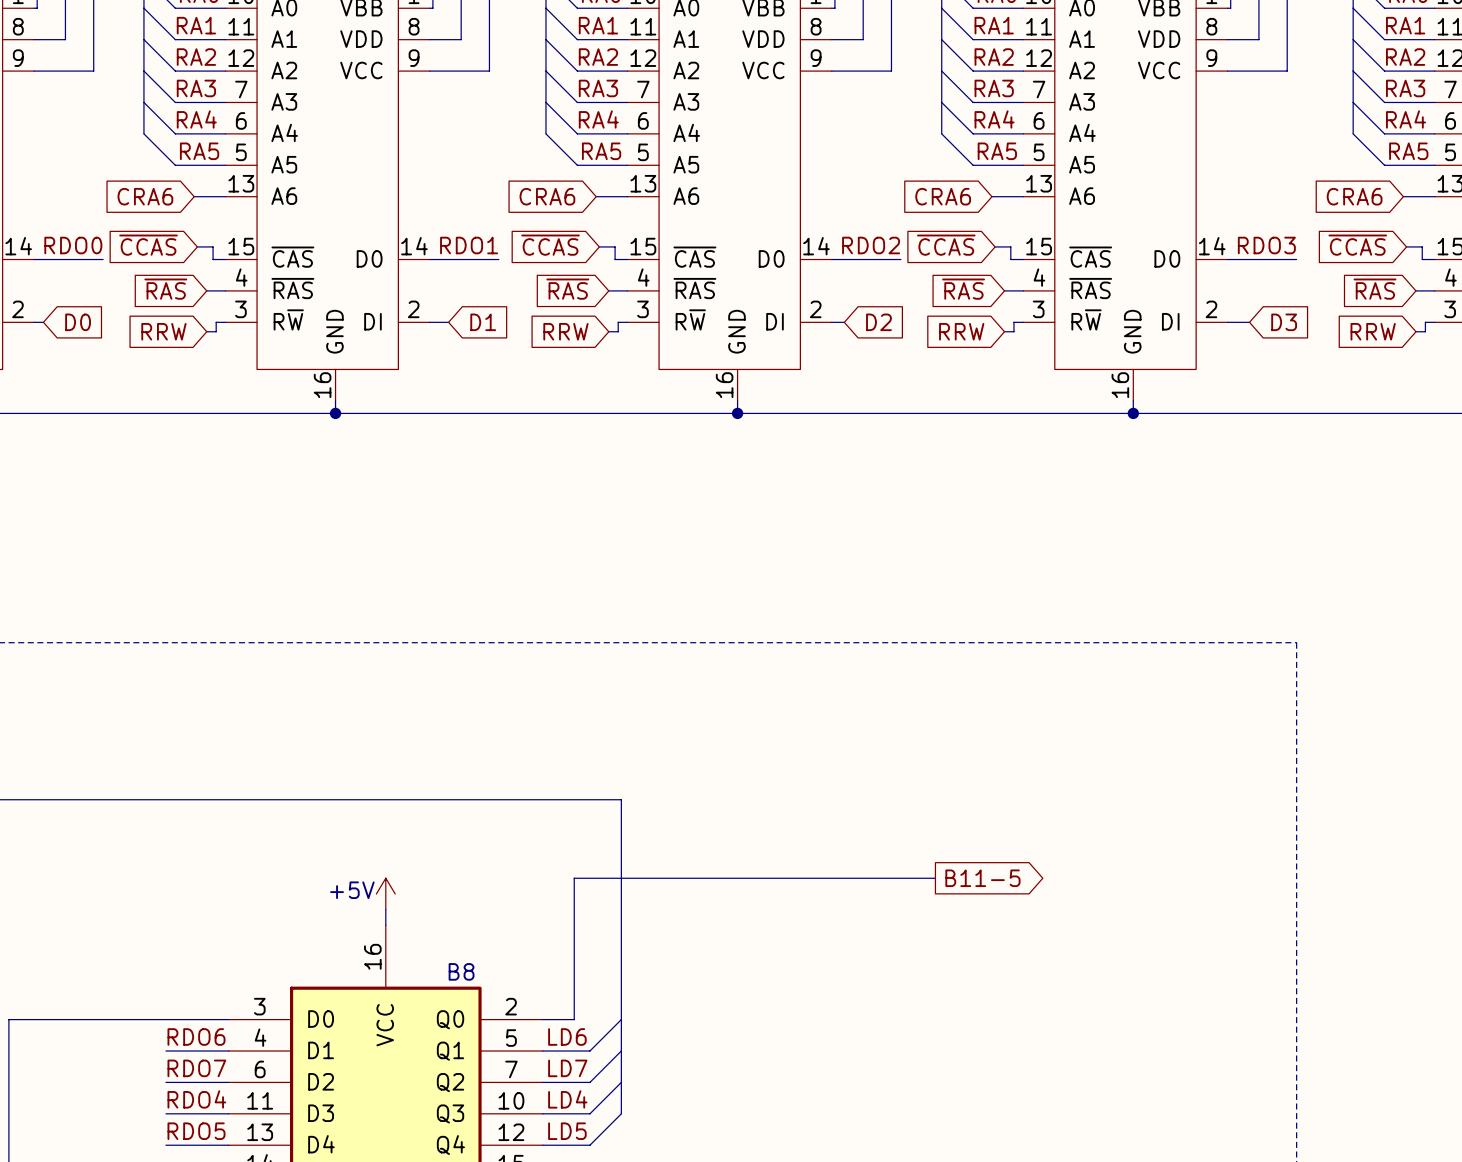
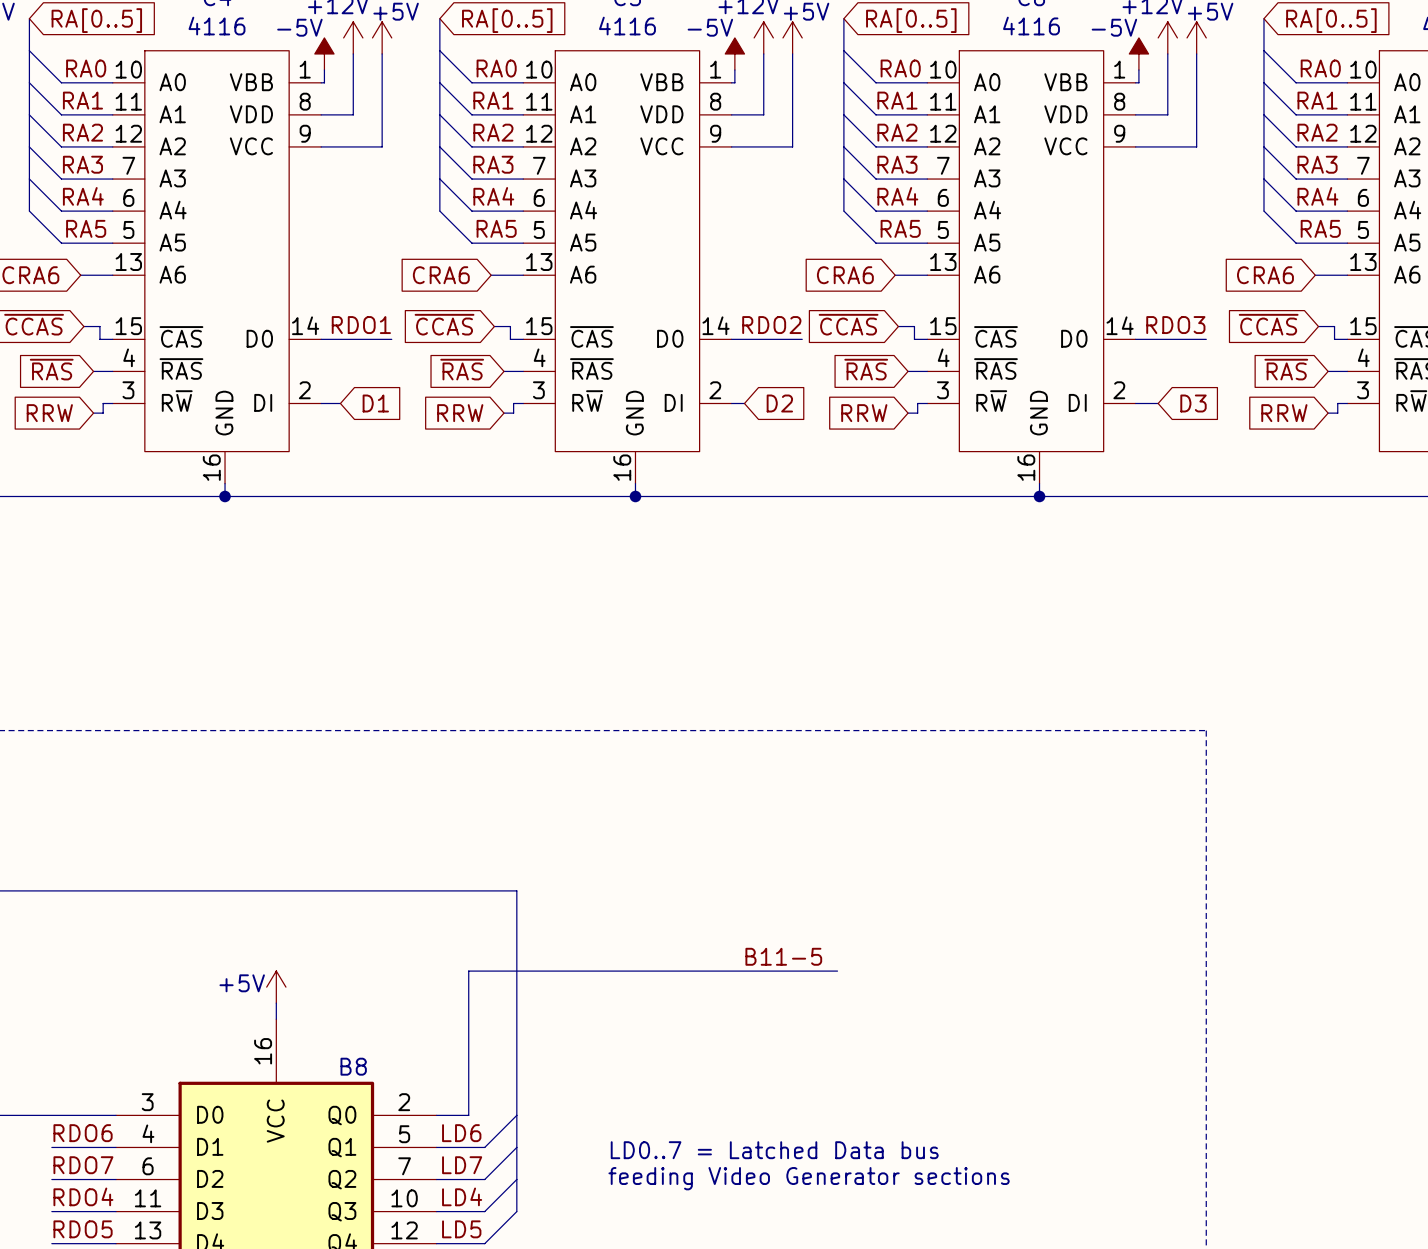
label: none -> B11-5 (783, 956)
global label: B11-5 (982, 878) -> none
text: none -> LD0..7 = Latched Data bus (774, 1150)
text: none -> feeding Video Generator sections (809, 1178)

